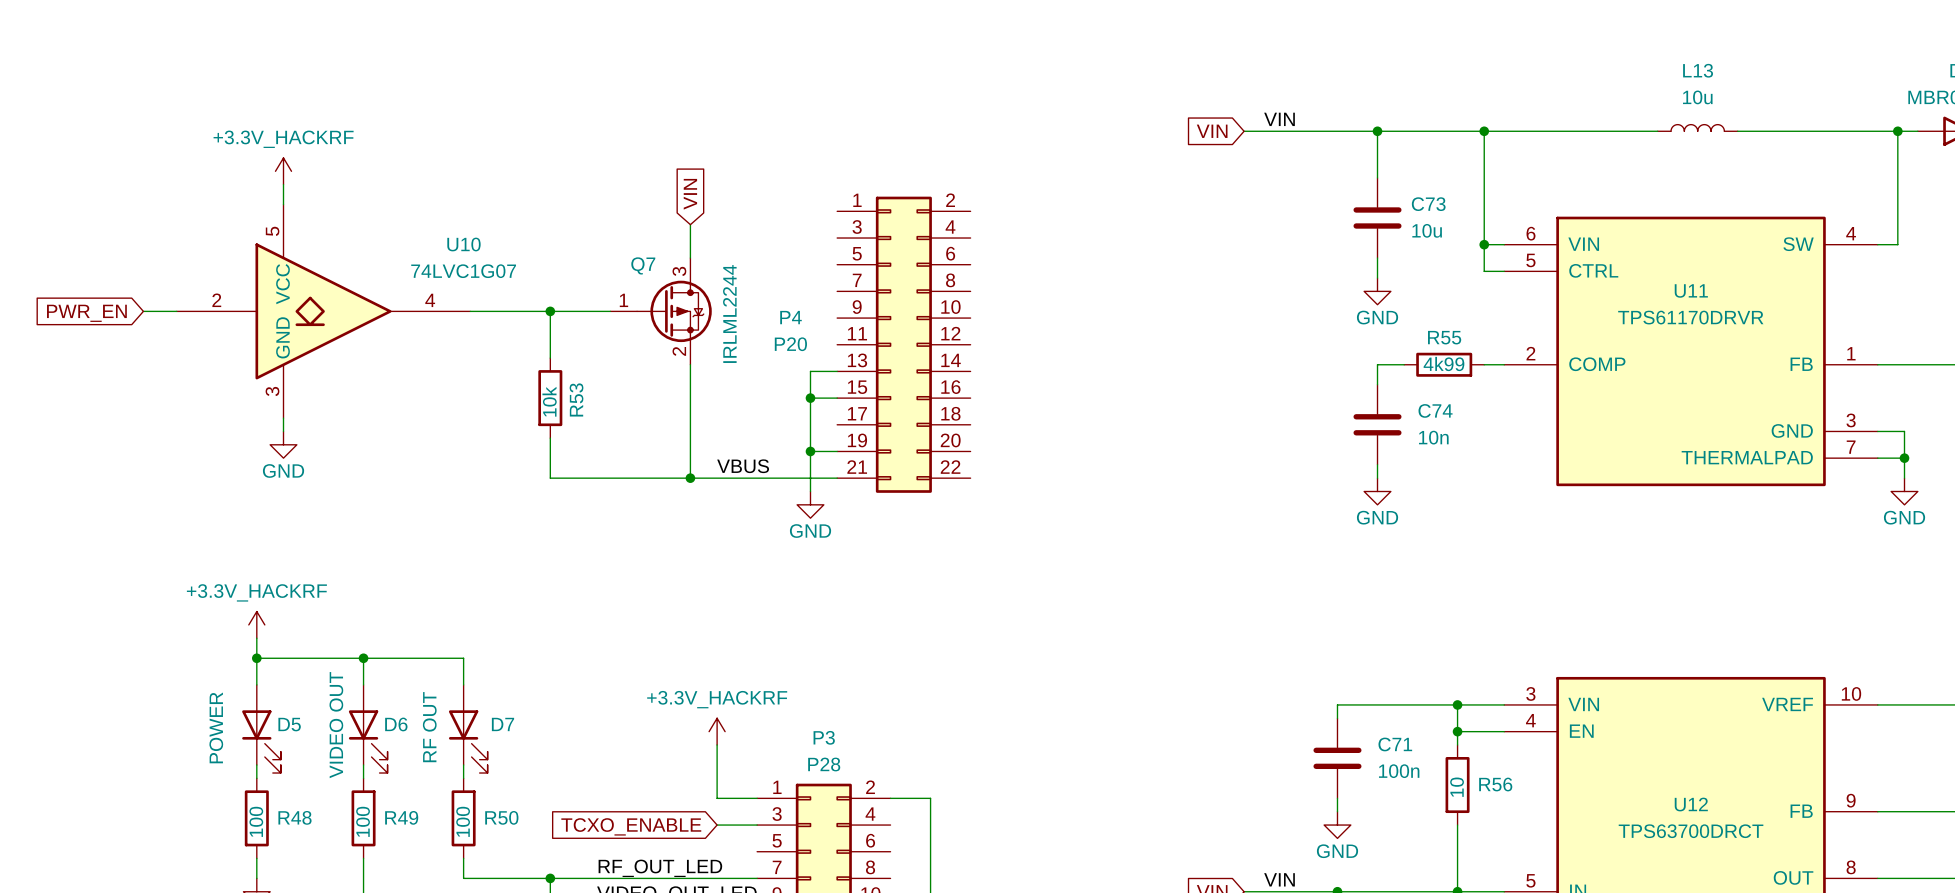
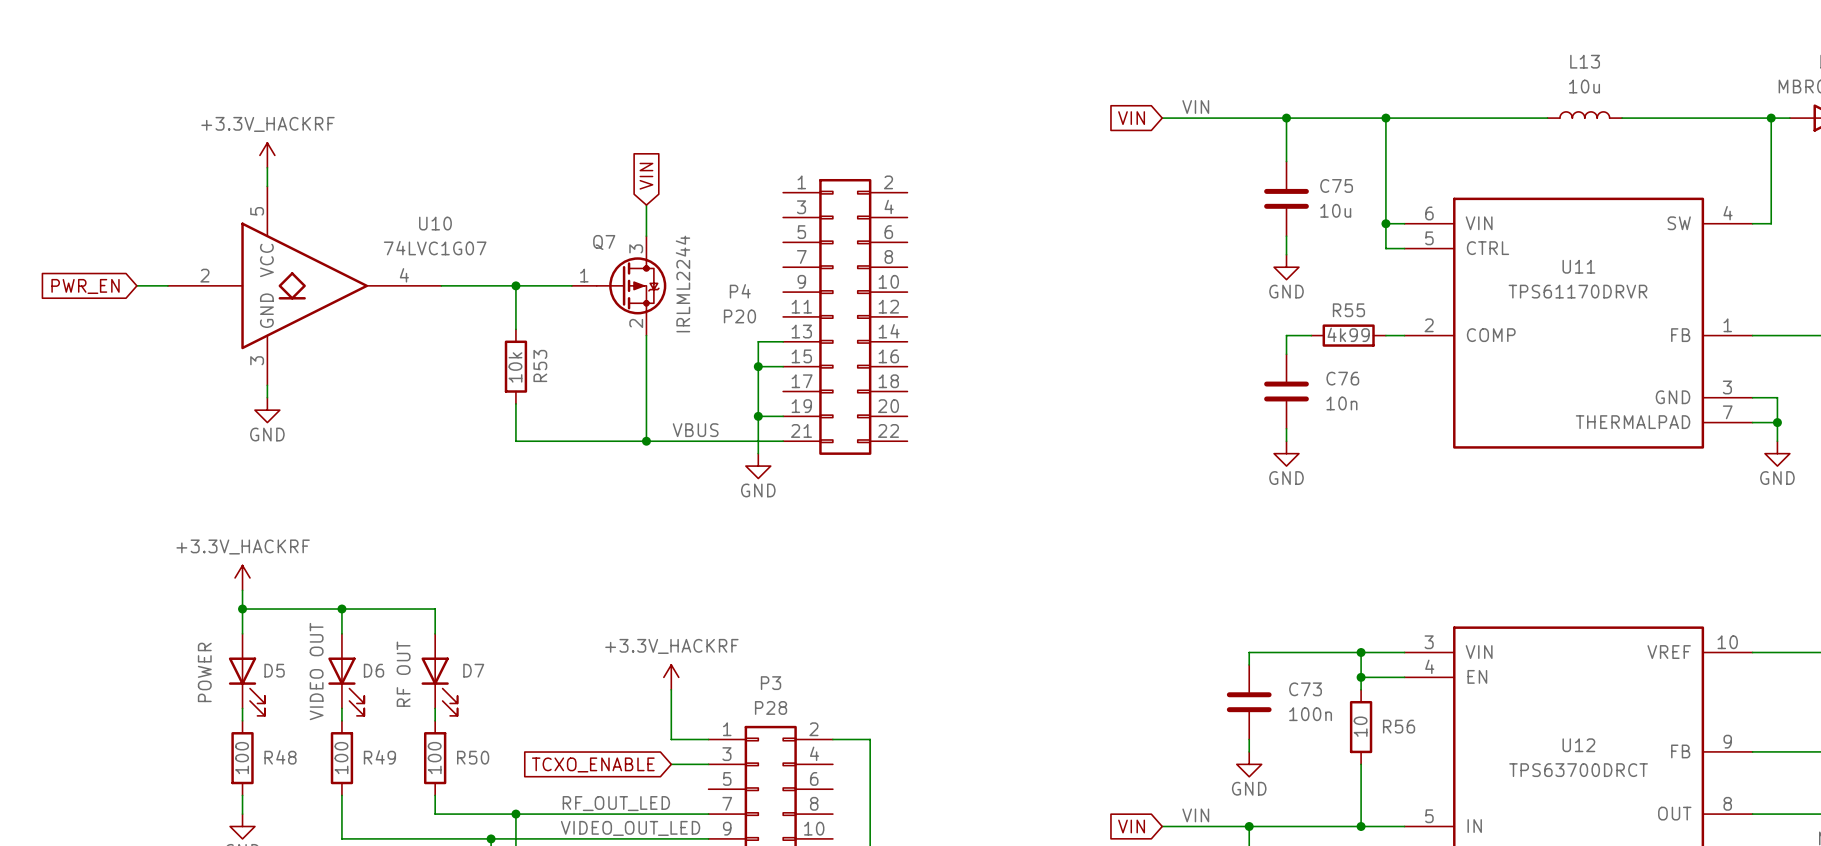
C73 name: C73 (1428, 204) -> C75 (1336, 185)
C74 name: C74 (1435, 410) -> C76 (1342, 378)
C71 name: C71 (1395, 744) -> C73 (1305, 689)

